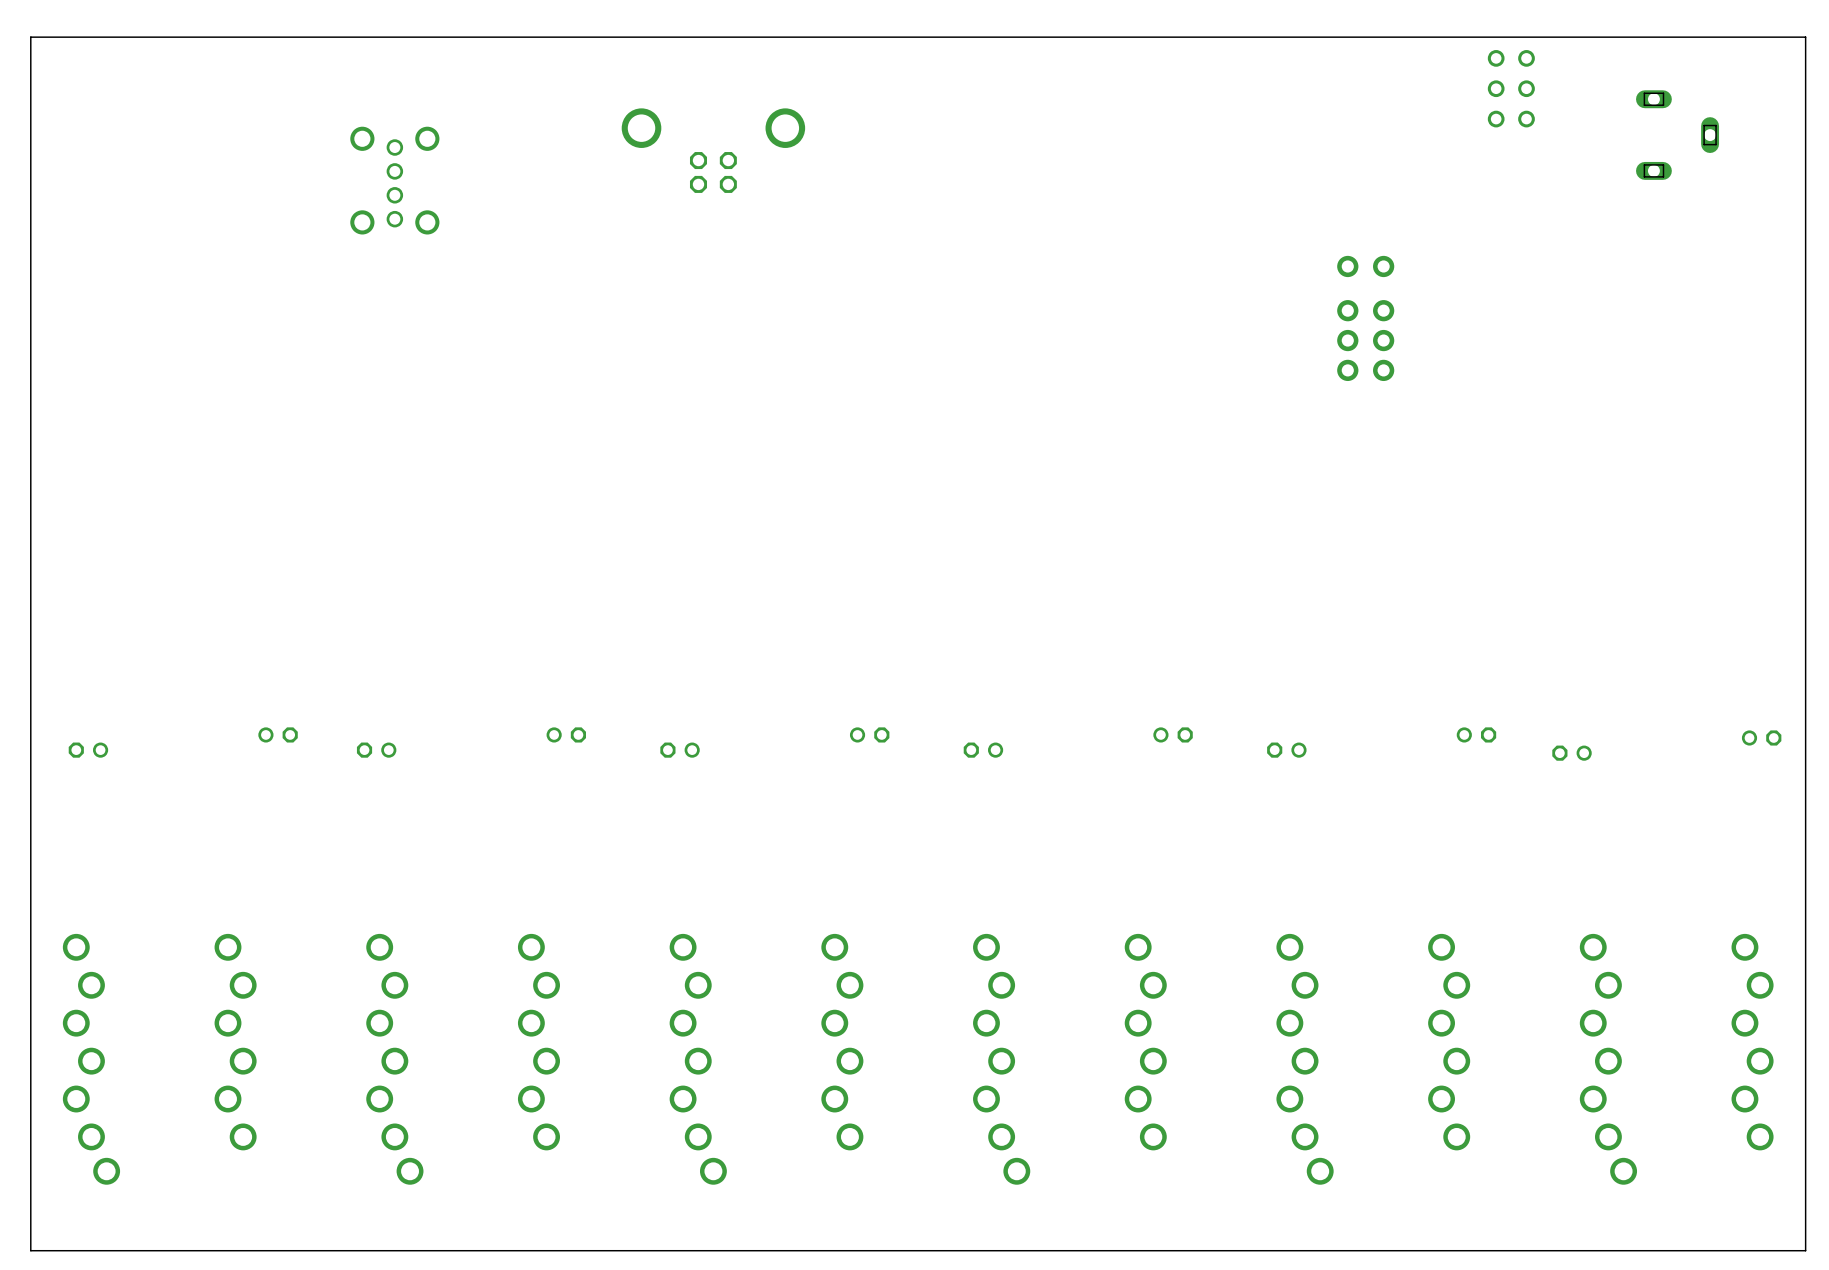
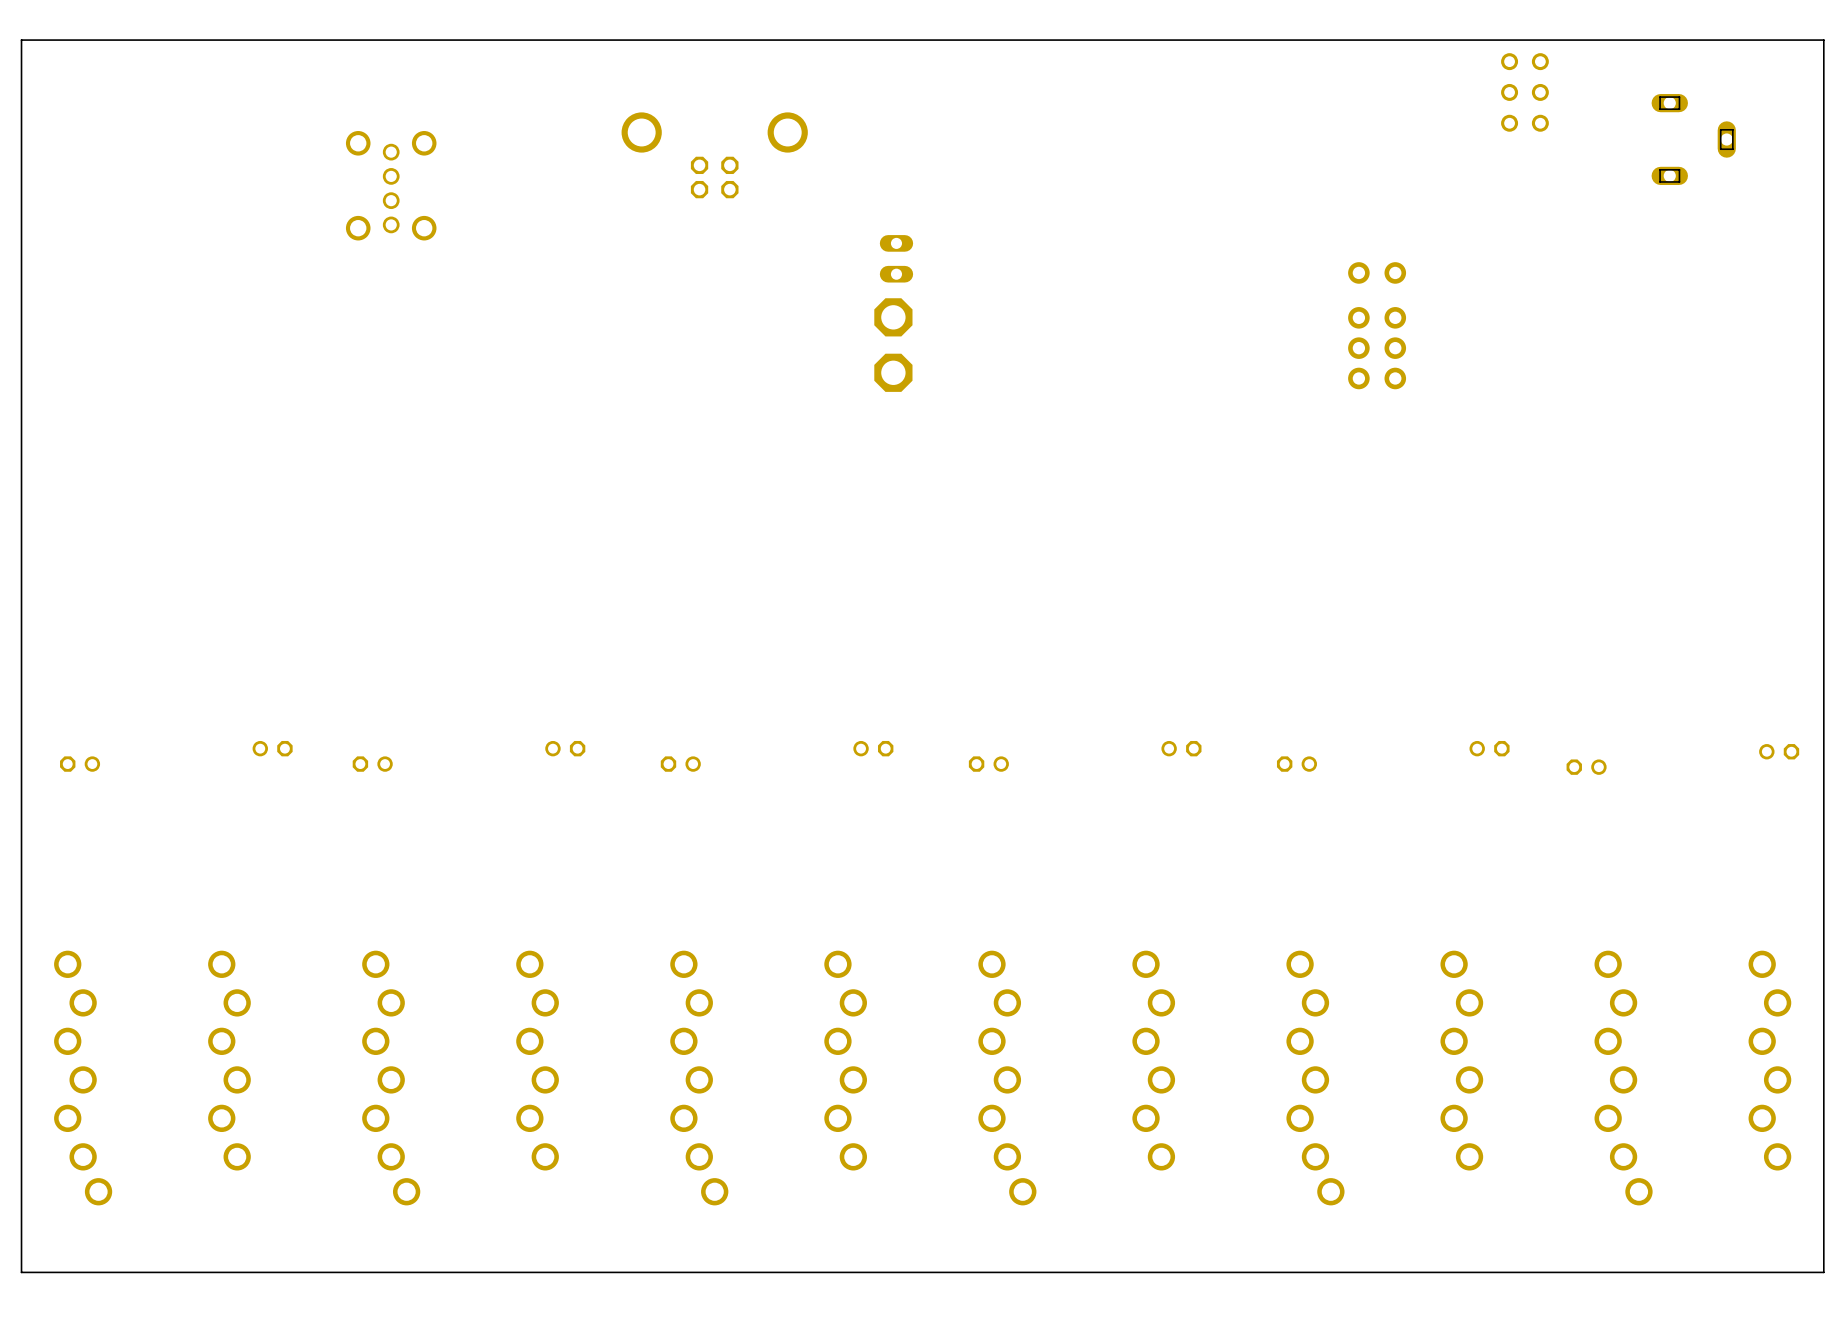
part: none -> (896, 258)
part: none -> (893, 317)
part: none -> (893, 372)

